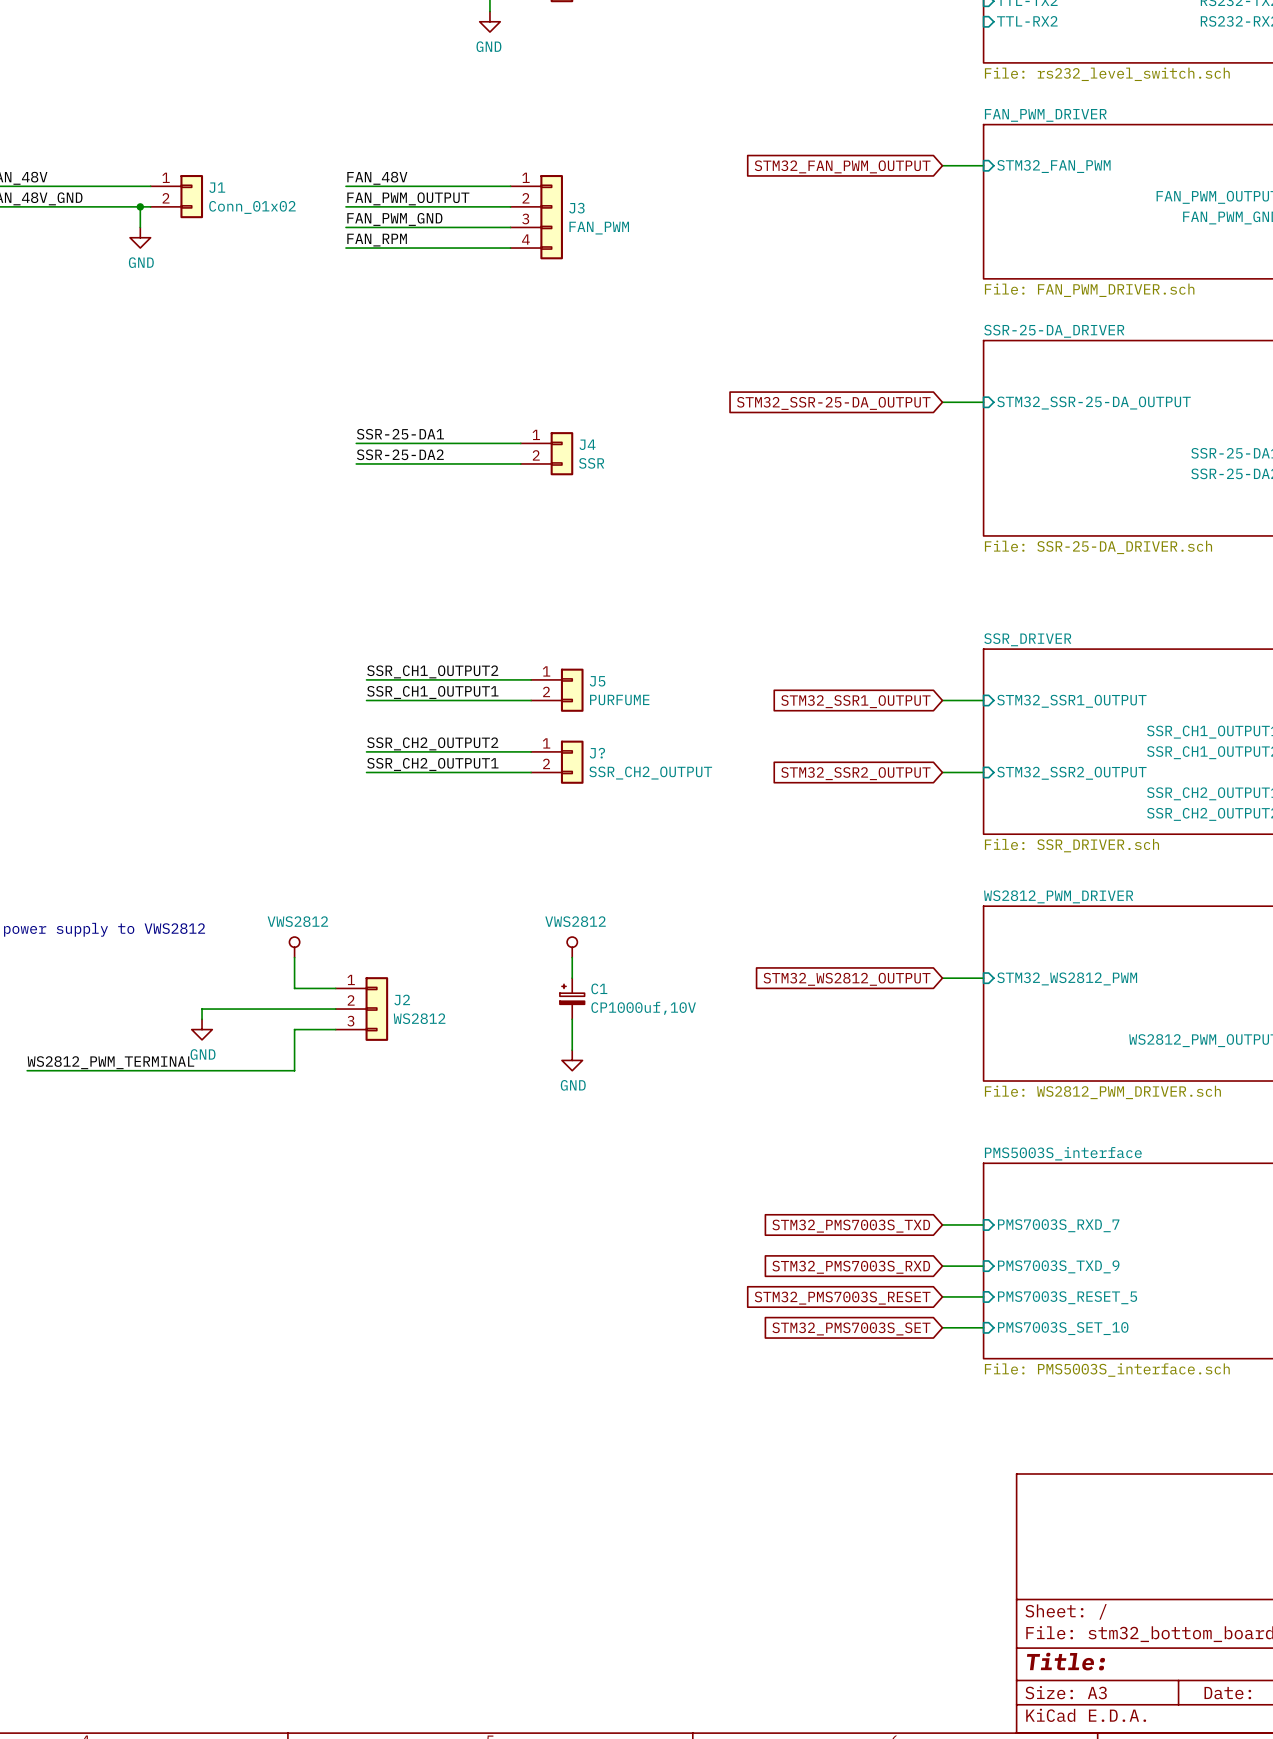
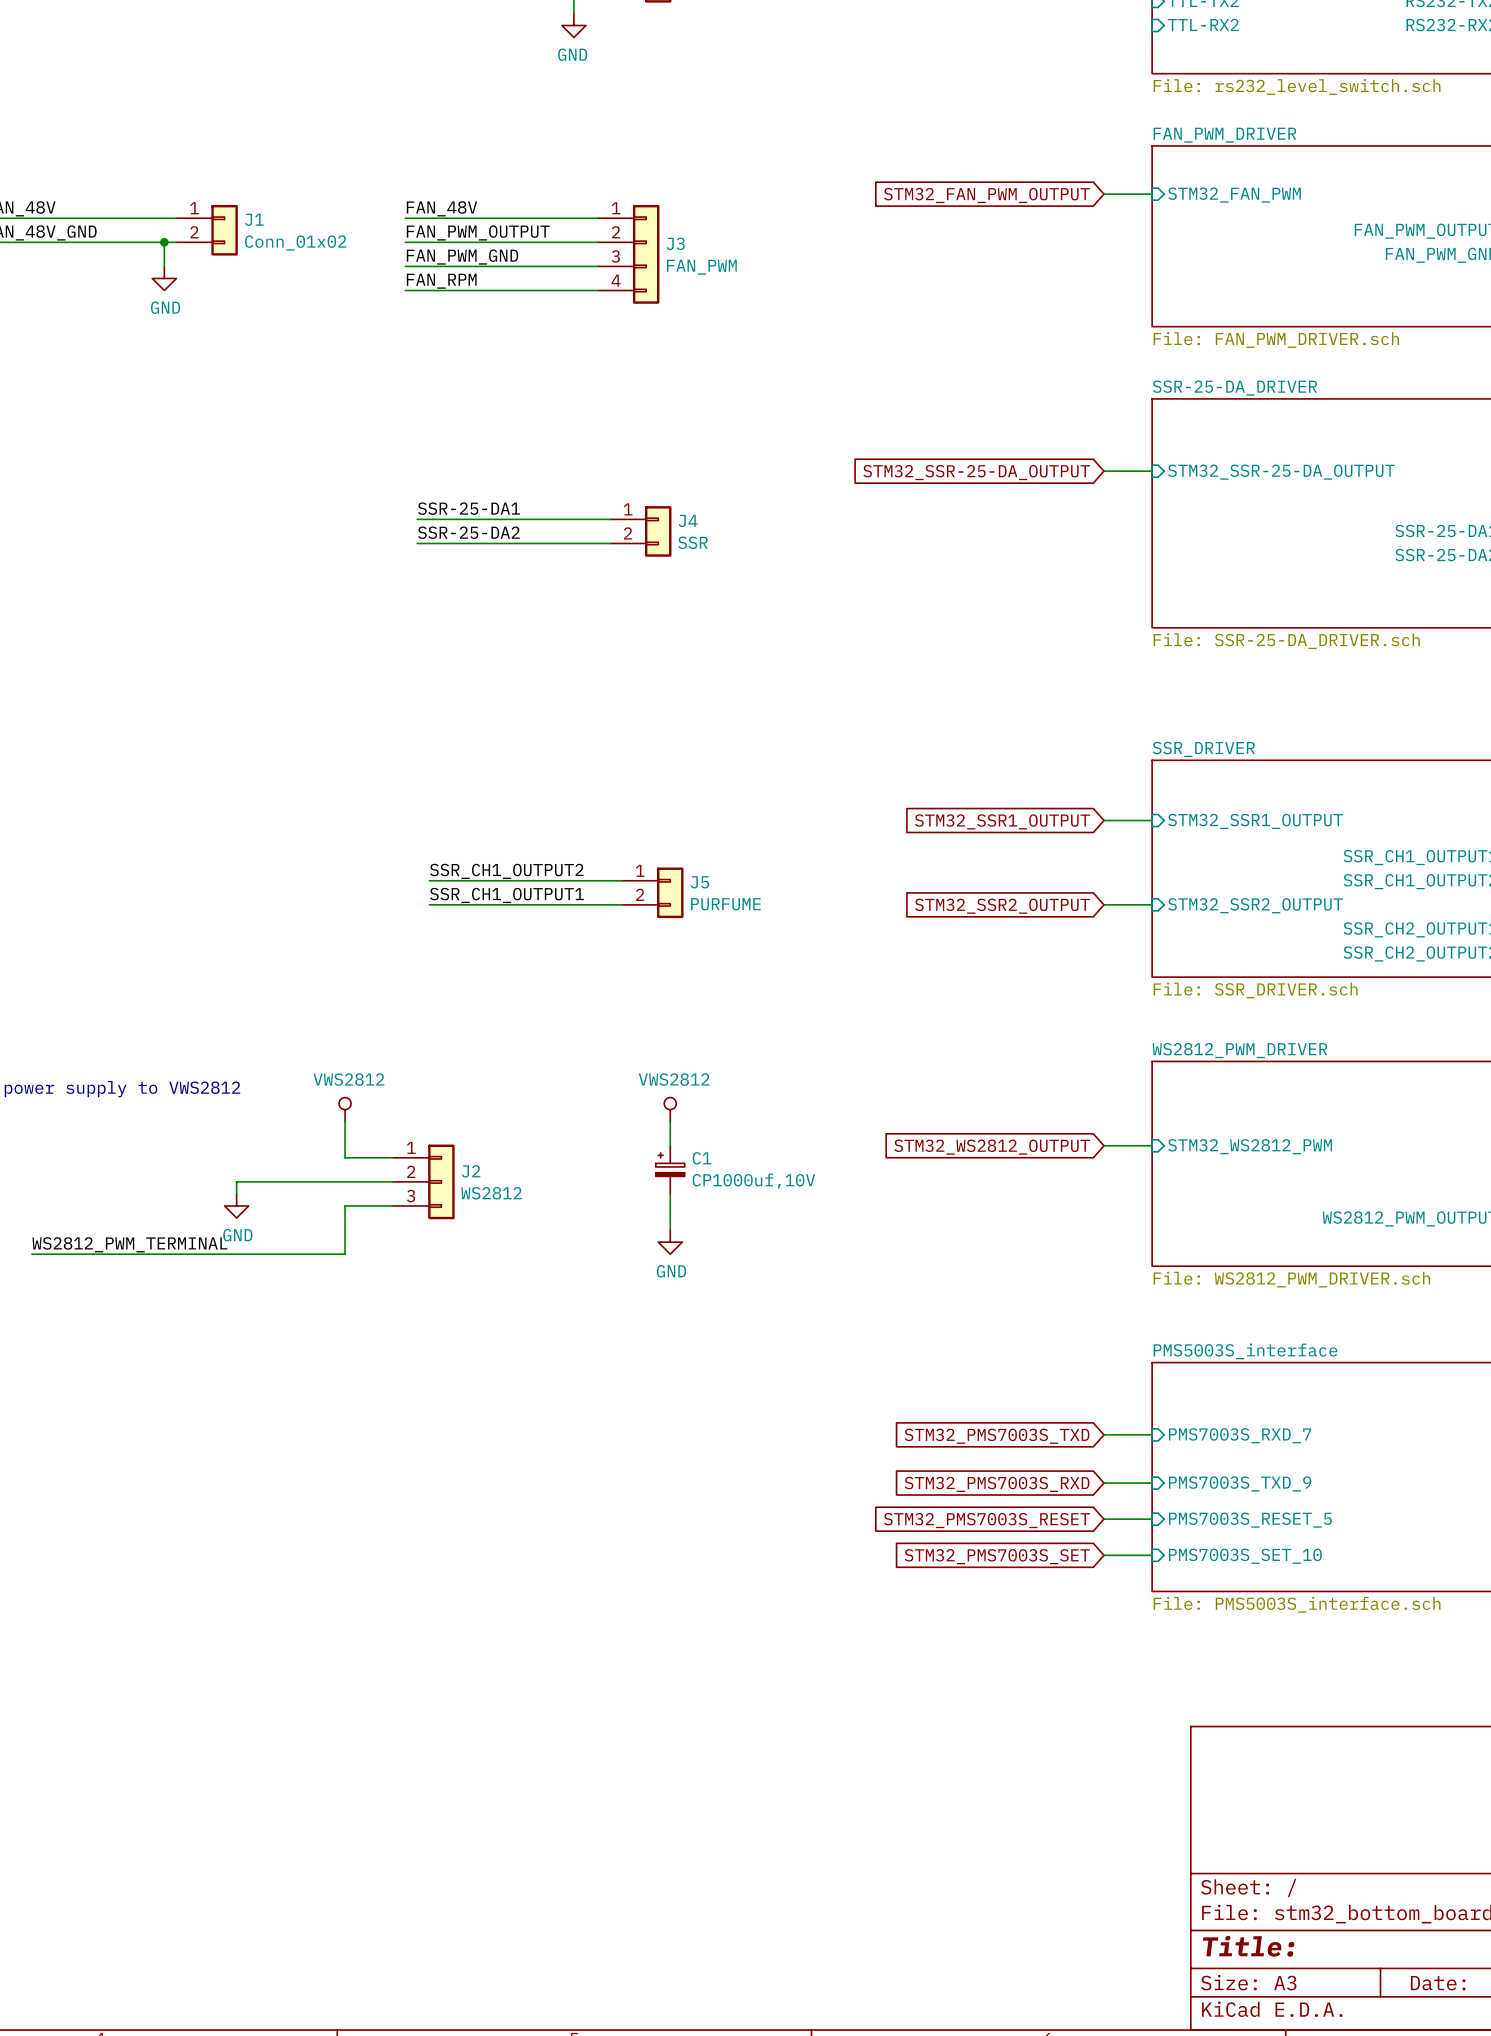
label: SSR_CH1_OUTPUT2 (432, 671) -> none
wire: (366, 679) (531, 679) -> none
J5: PURFUME (557, 690) -> none
label: SSR_CH1_OUTPUT1 (432, 692) -> none
wire: (366, 700) (531, 700) -> none
label: SSR_CH2_OUTPUT2 (432, 743) -> SSR_CH1_OUTPUT2 (506, 871)
J? name: J? (597, 753) -> J5 (699, 882)
label: SSR_CH2_OUTPUT1 (432, 764) -> SSR_CH1_OUTPUT1 (507, 895)
J? value: SSR_CH2_OUTPUT (650, 773) -> PURFUME (725, 904)

